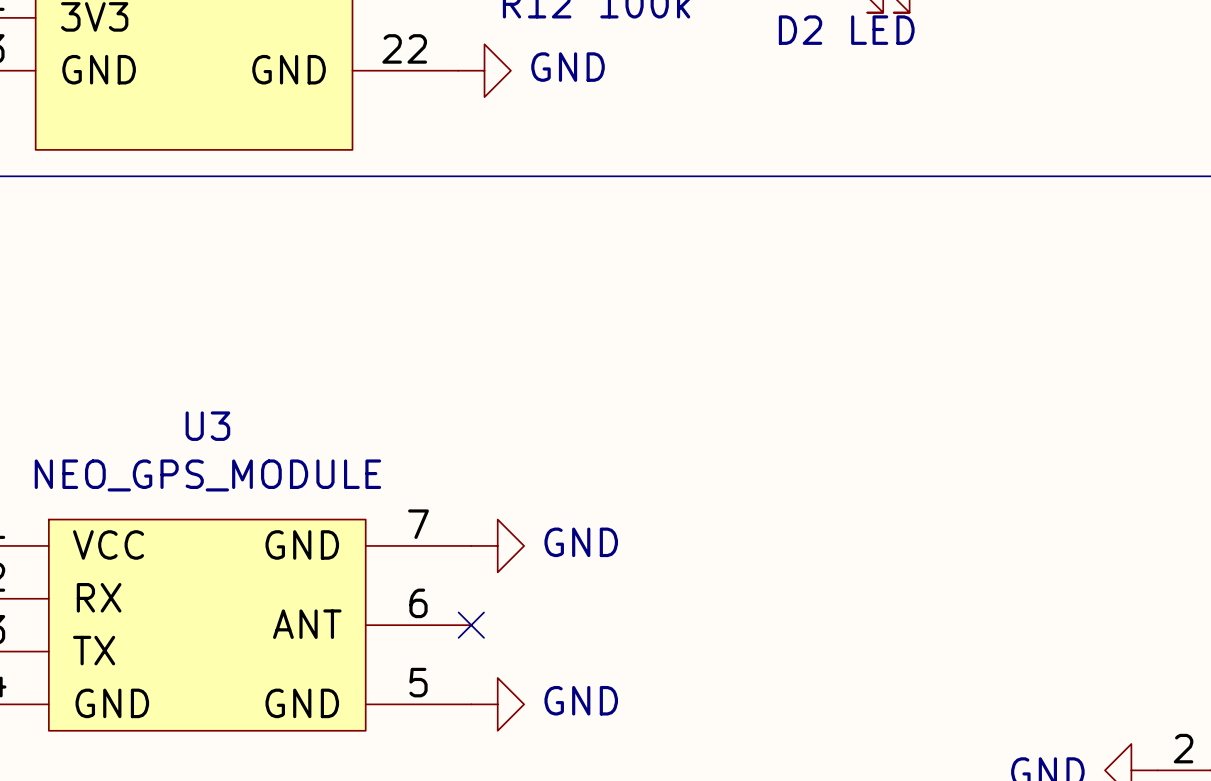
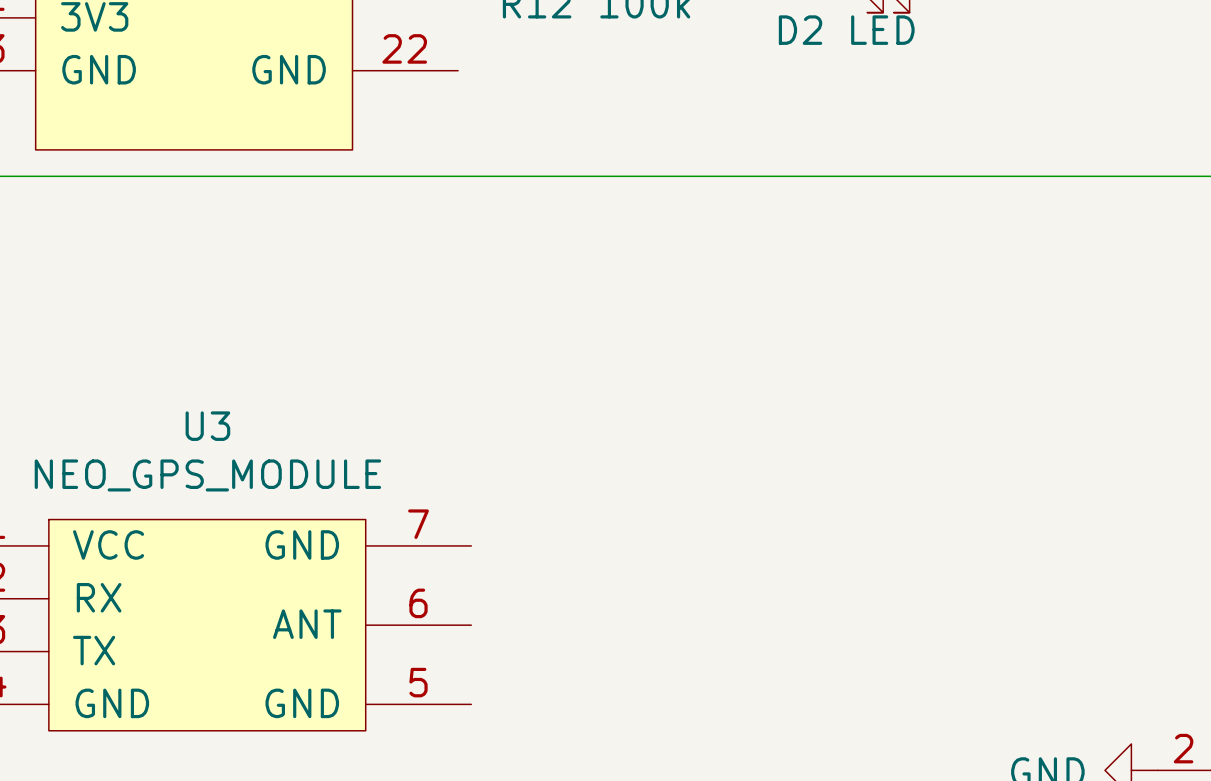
power symbol: GND (484, 70) -> none
power symbol: GND (497, 545) -> none
no-connect mark: (471, 625) -> none
power symbol: GND (497, 704) -> none

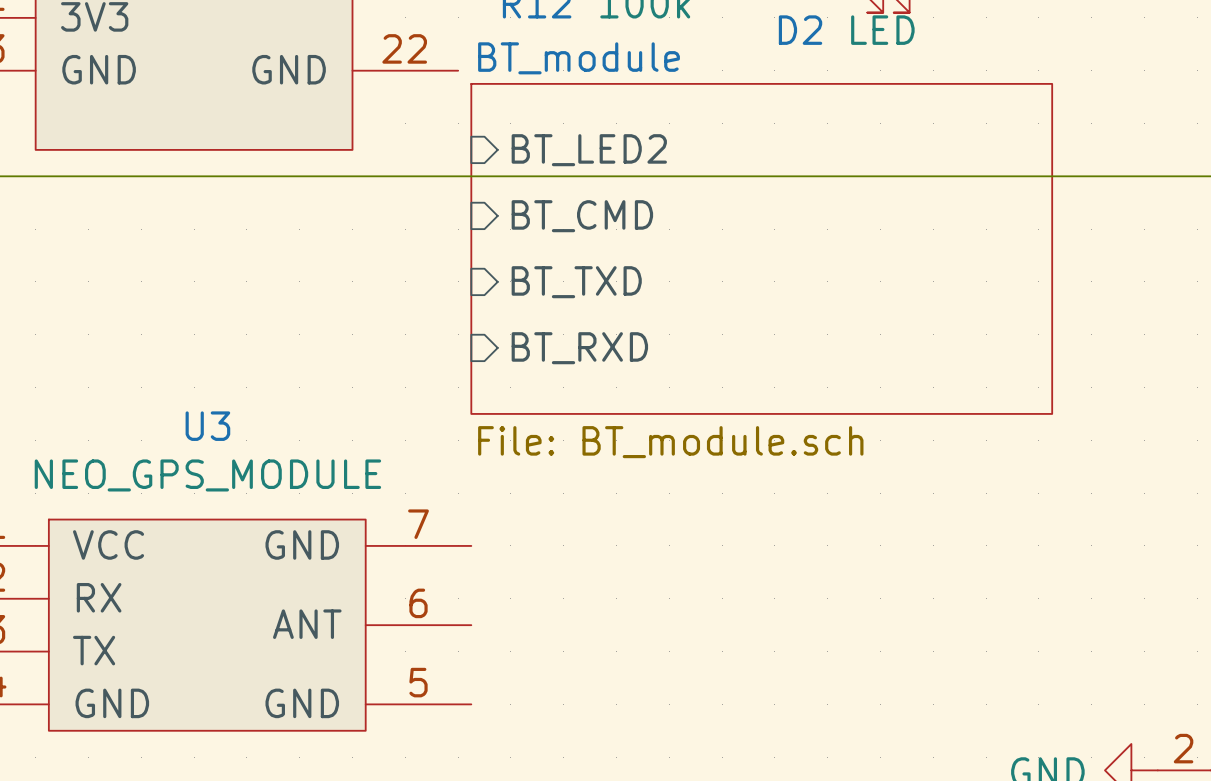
sheet pin: none -> BT_LED2 (589, 150)
sheet pin: none -> BT_CMD (582, 216)
sheet BT_module: none -> File: BT_module.sch (761, 248)
sheet pin: none -> BT_TXD (576, 282)
sheet pin: none -> BT_RXD (579, 348)

